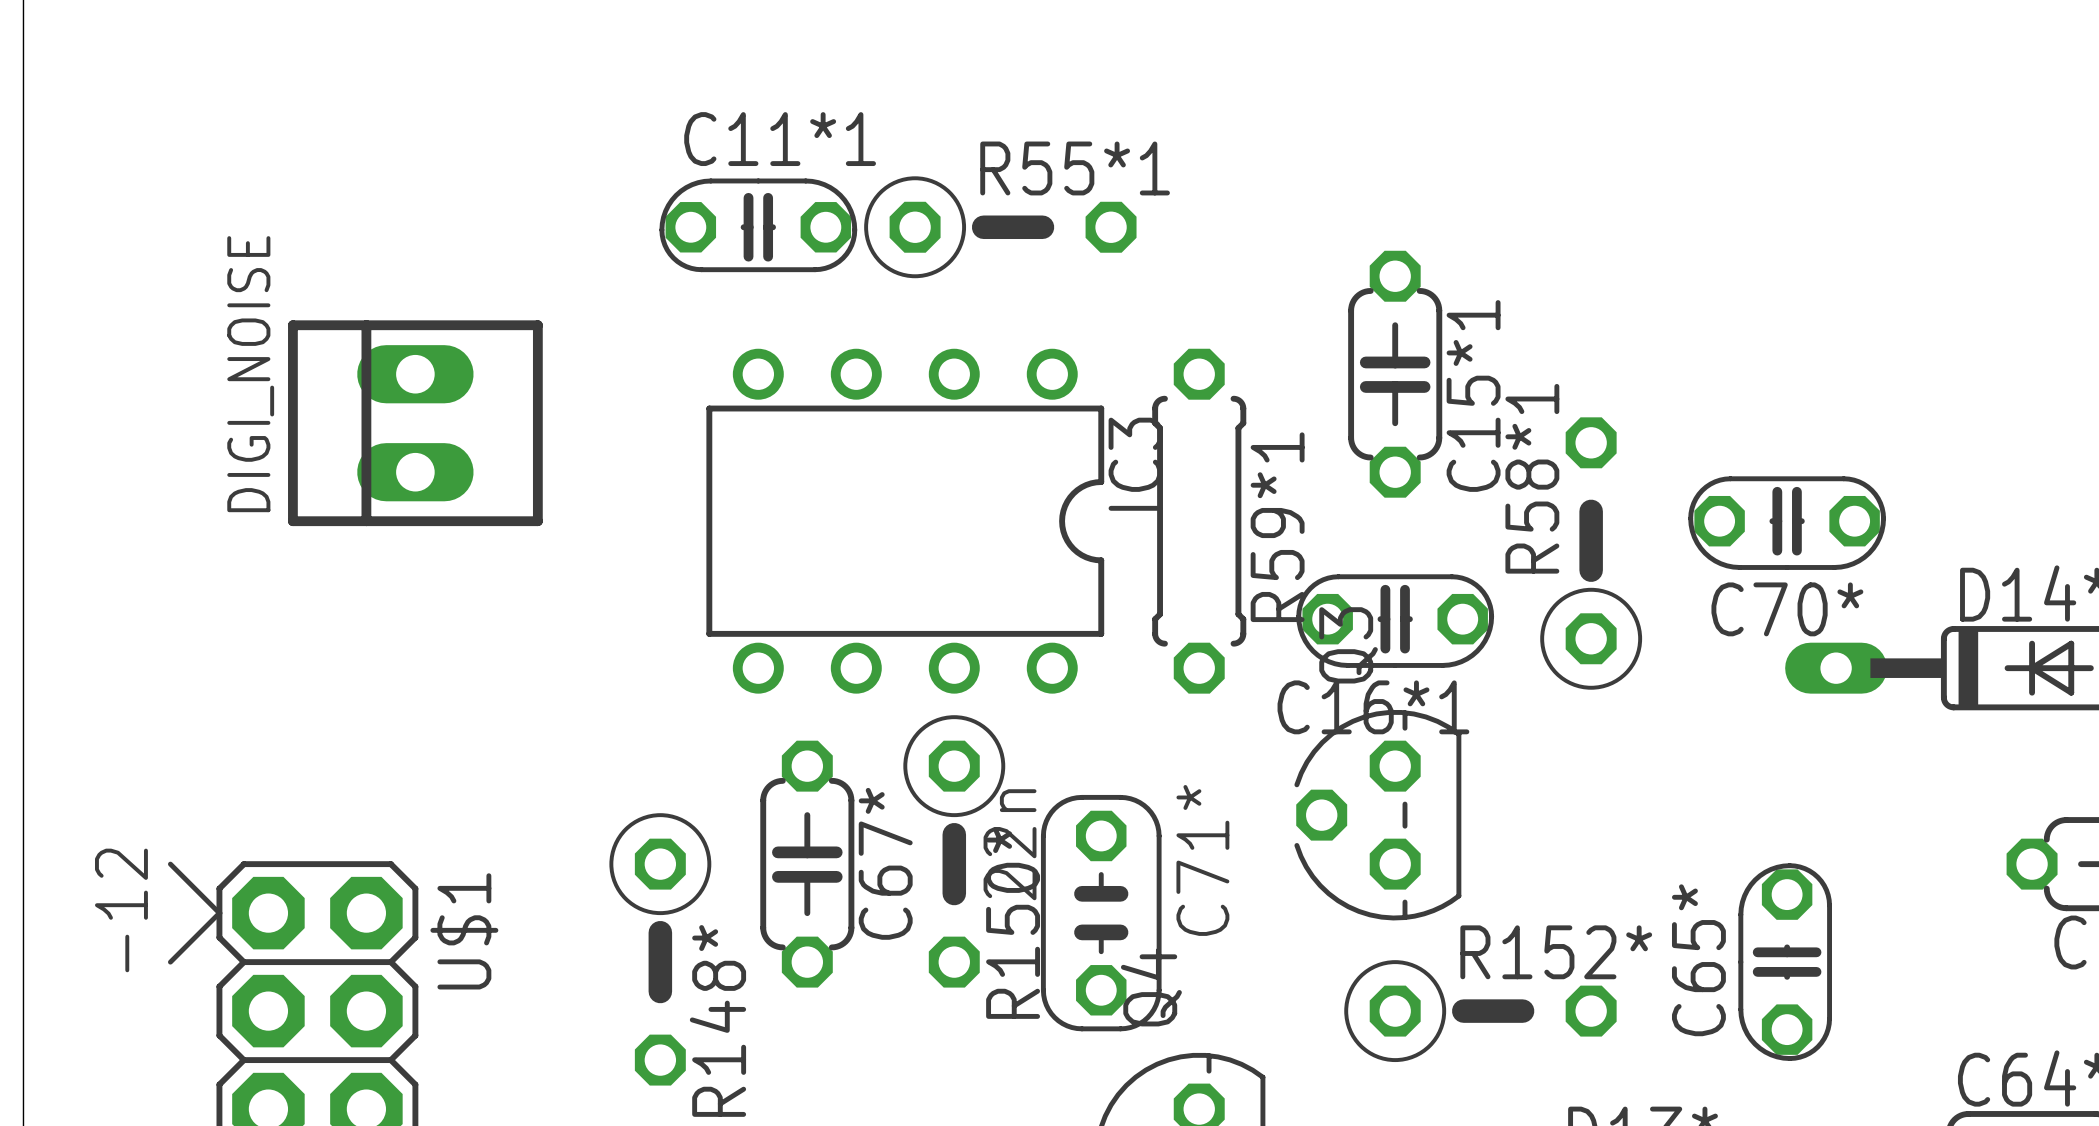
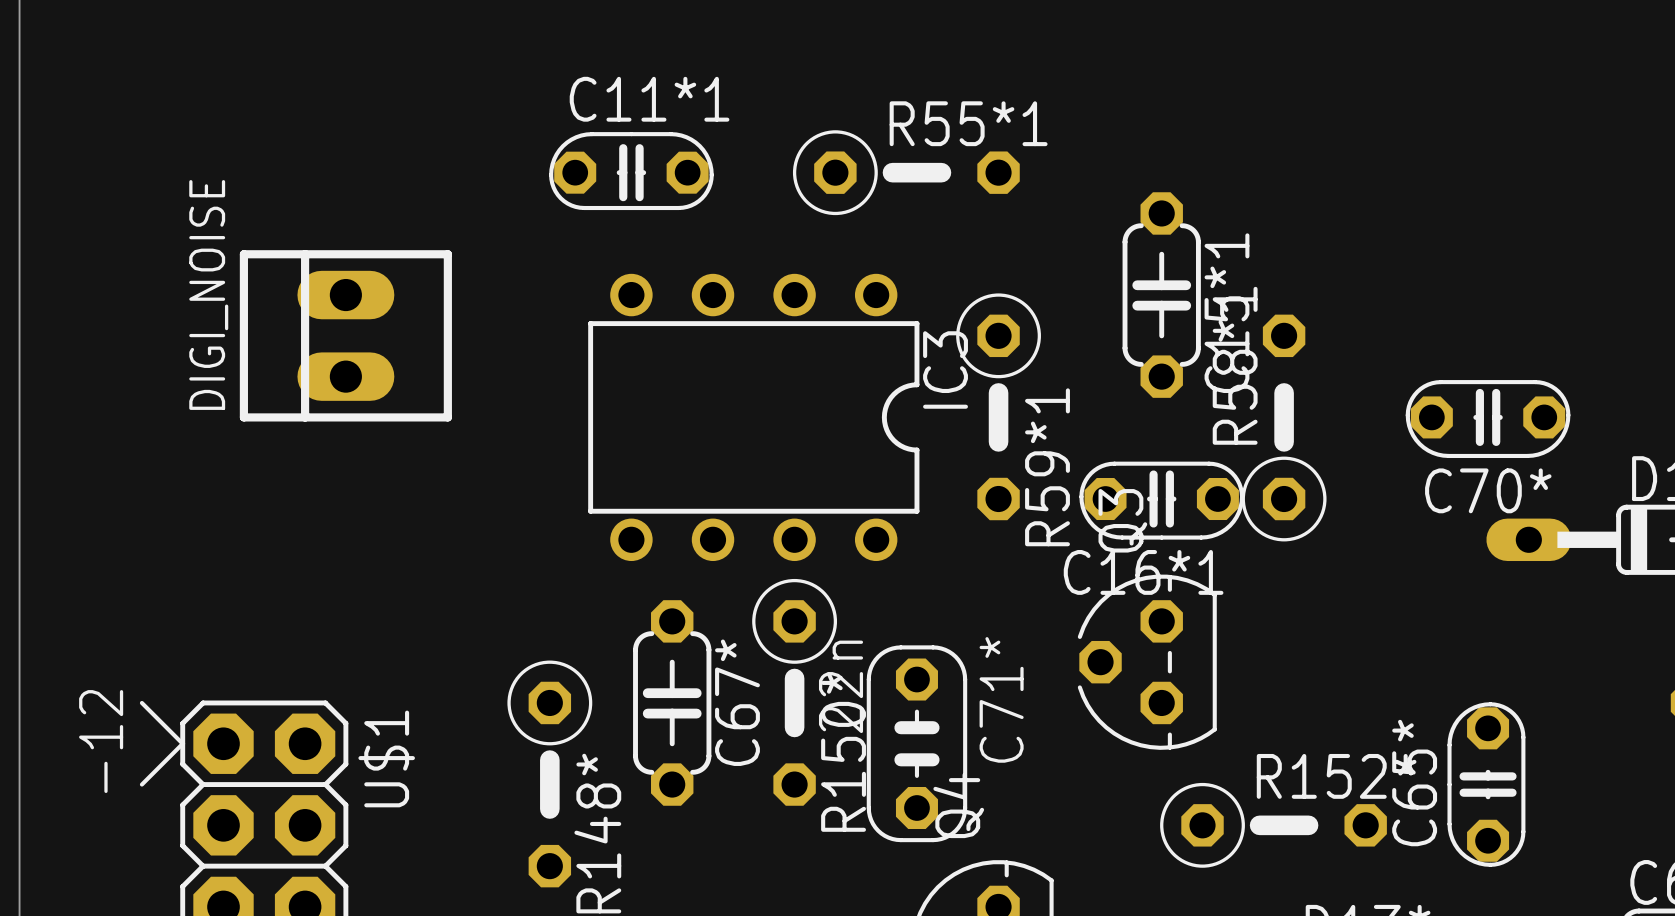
R55*1 position: (1000, 227) -> (906, 172)
R59*1 footprint: [1152, 348, 1247, 694] -> [956, 293, 1041, 521]
R58*1 position: (1591, 553) -> (1284, 428)
R152* position: (1480, 1011) -> (1273, 825)

